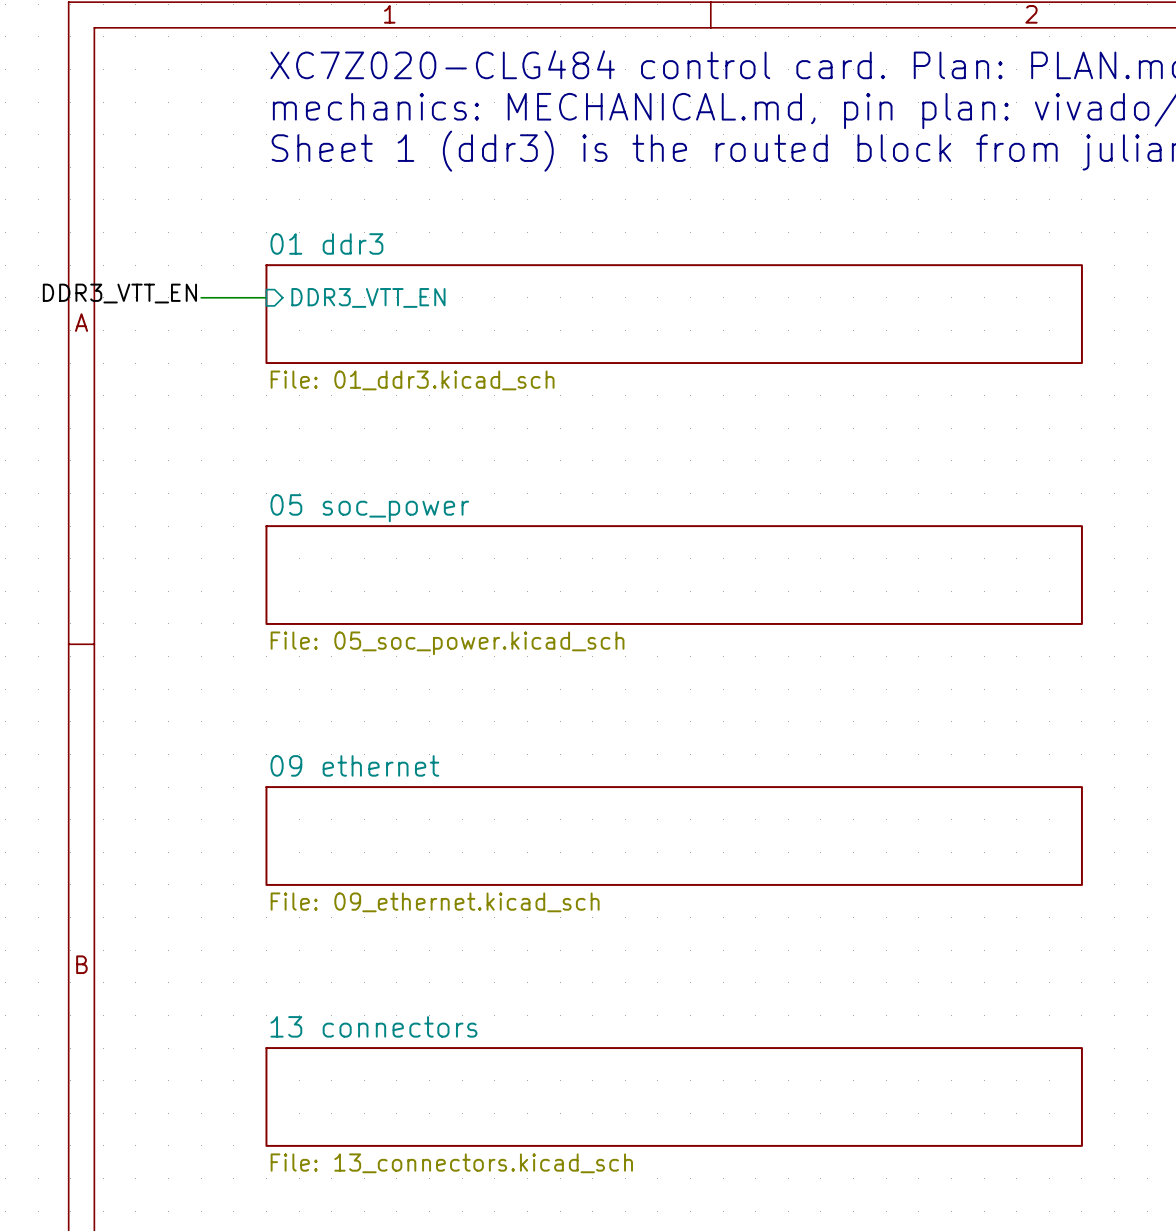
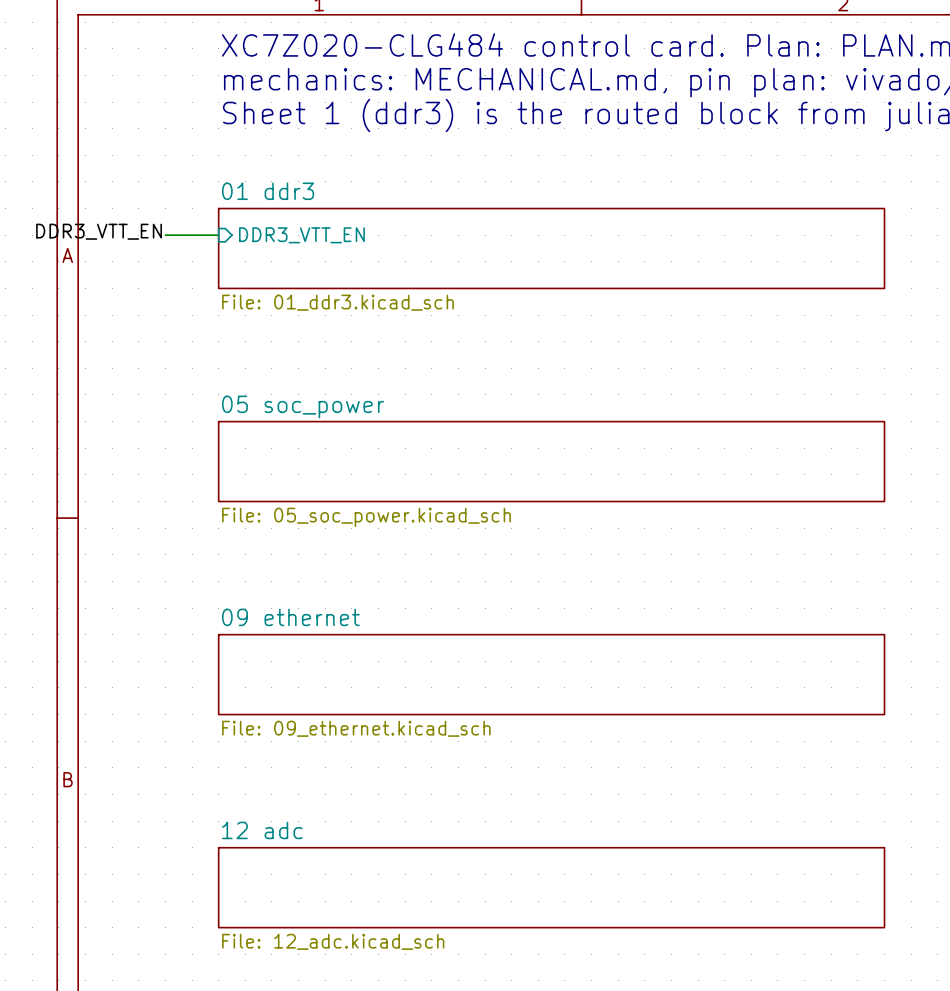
sheet 13 connectors name: 13 connectors (373, 1026) -> 12 adc (262, 830)
sheet 13 connectors value: File: 13_connectors.kicad_sch (451, 1163) -> File: 12_adc.kicad_sch (333, 941)

